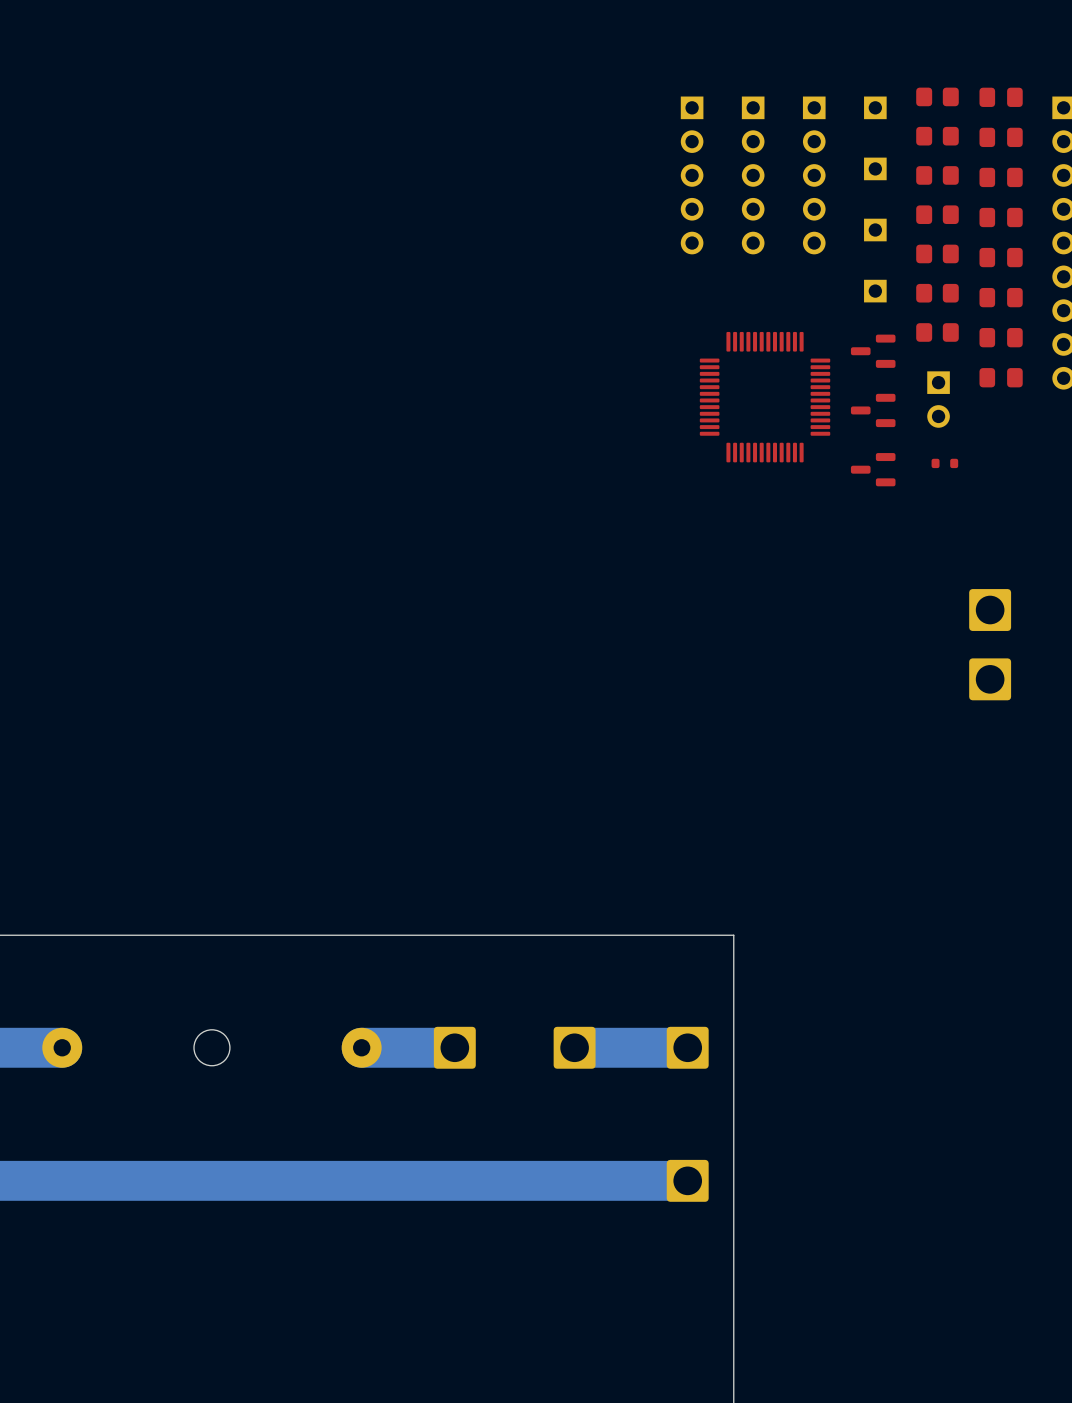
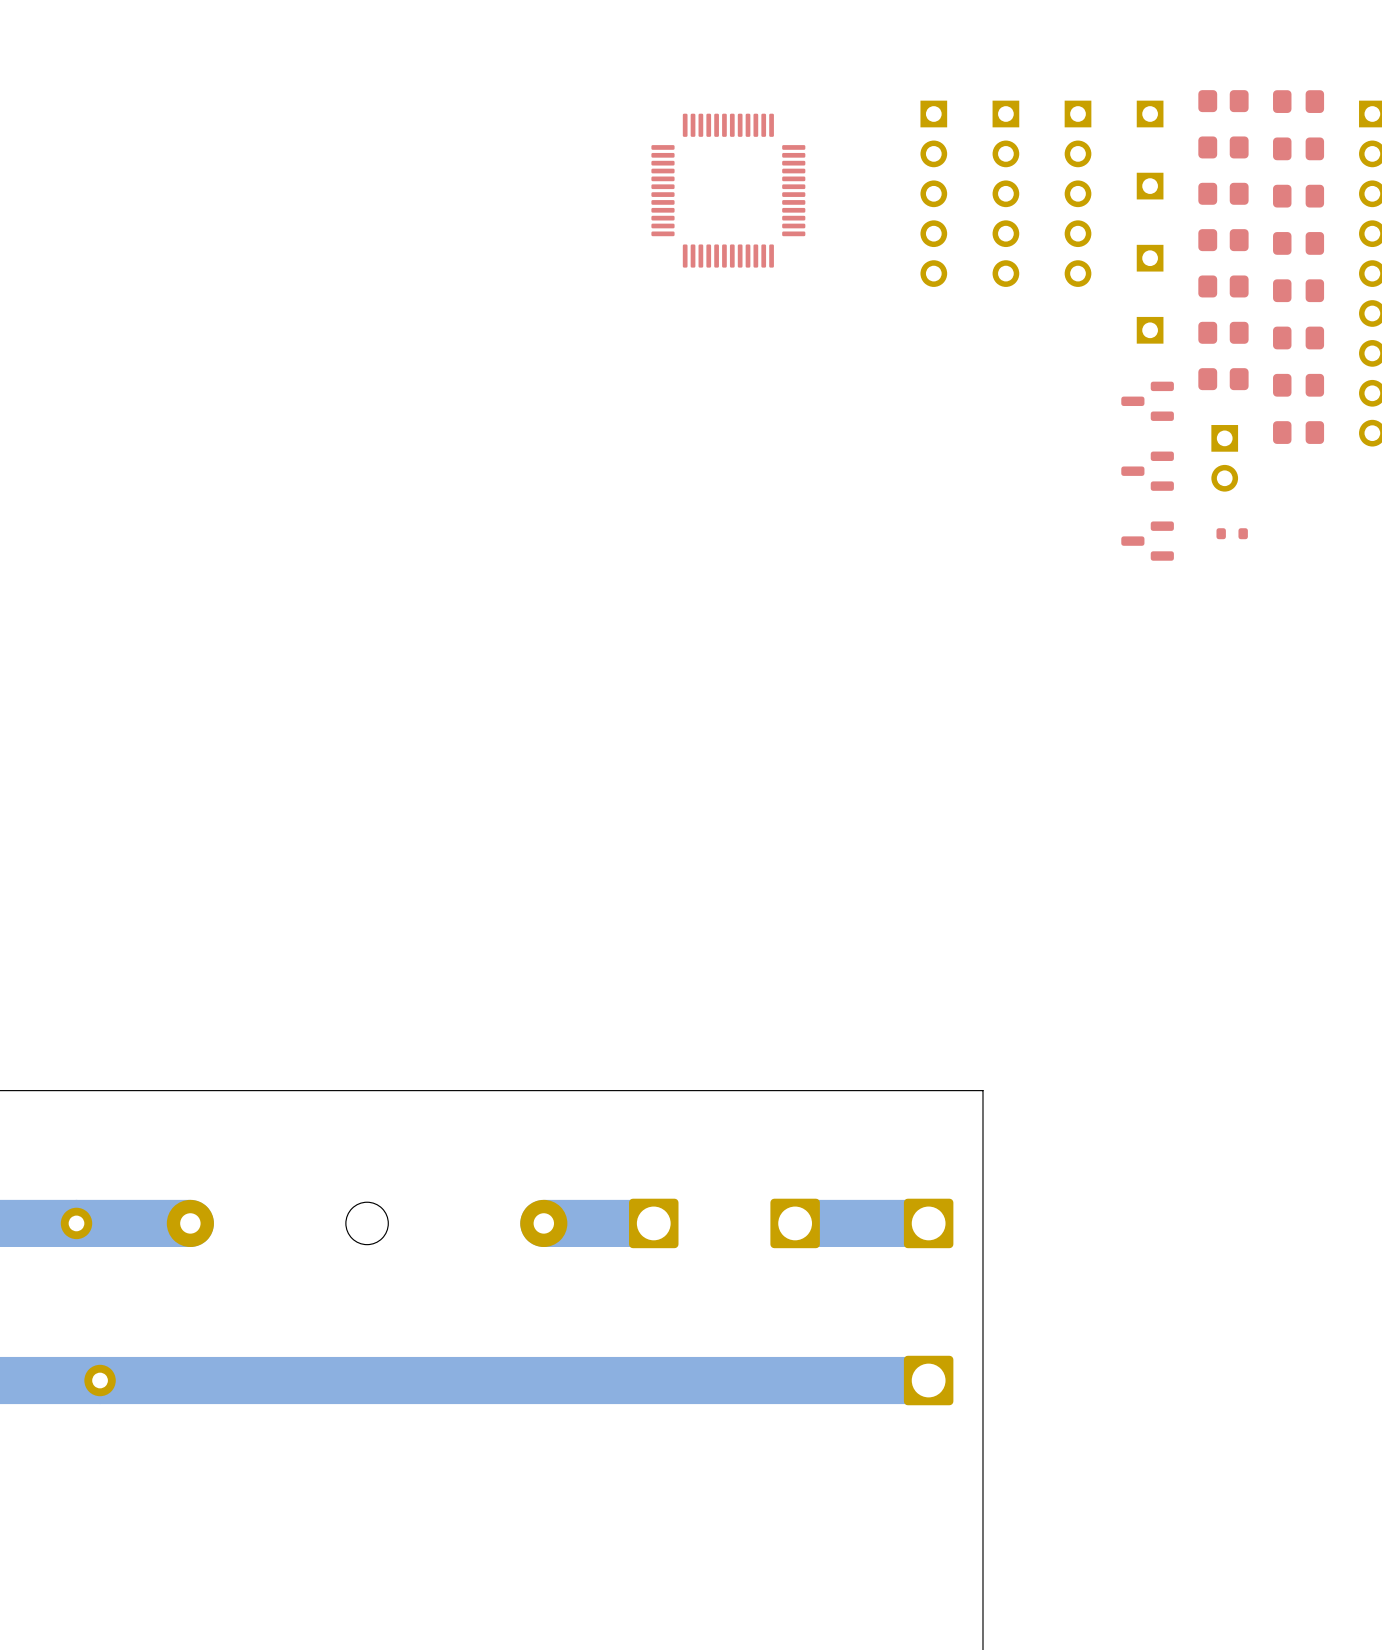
part: none -> (728, 190)
part: (765, 397) -> none
part: (990, 610) -> none
part: (990, 679) -> none

